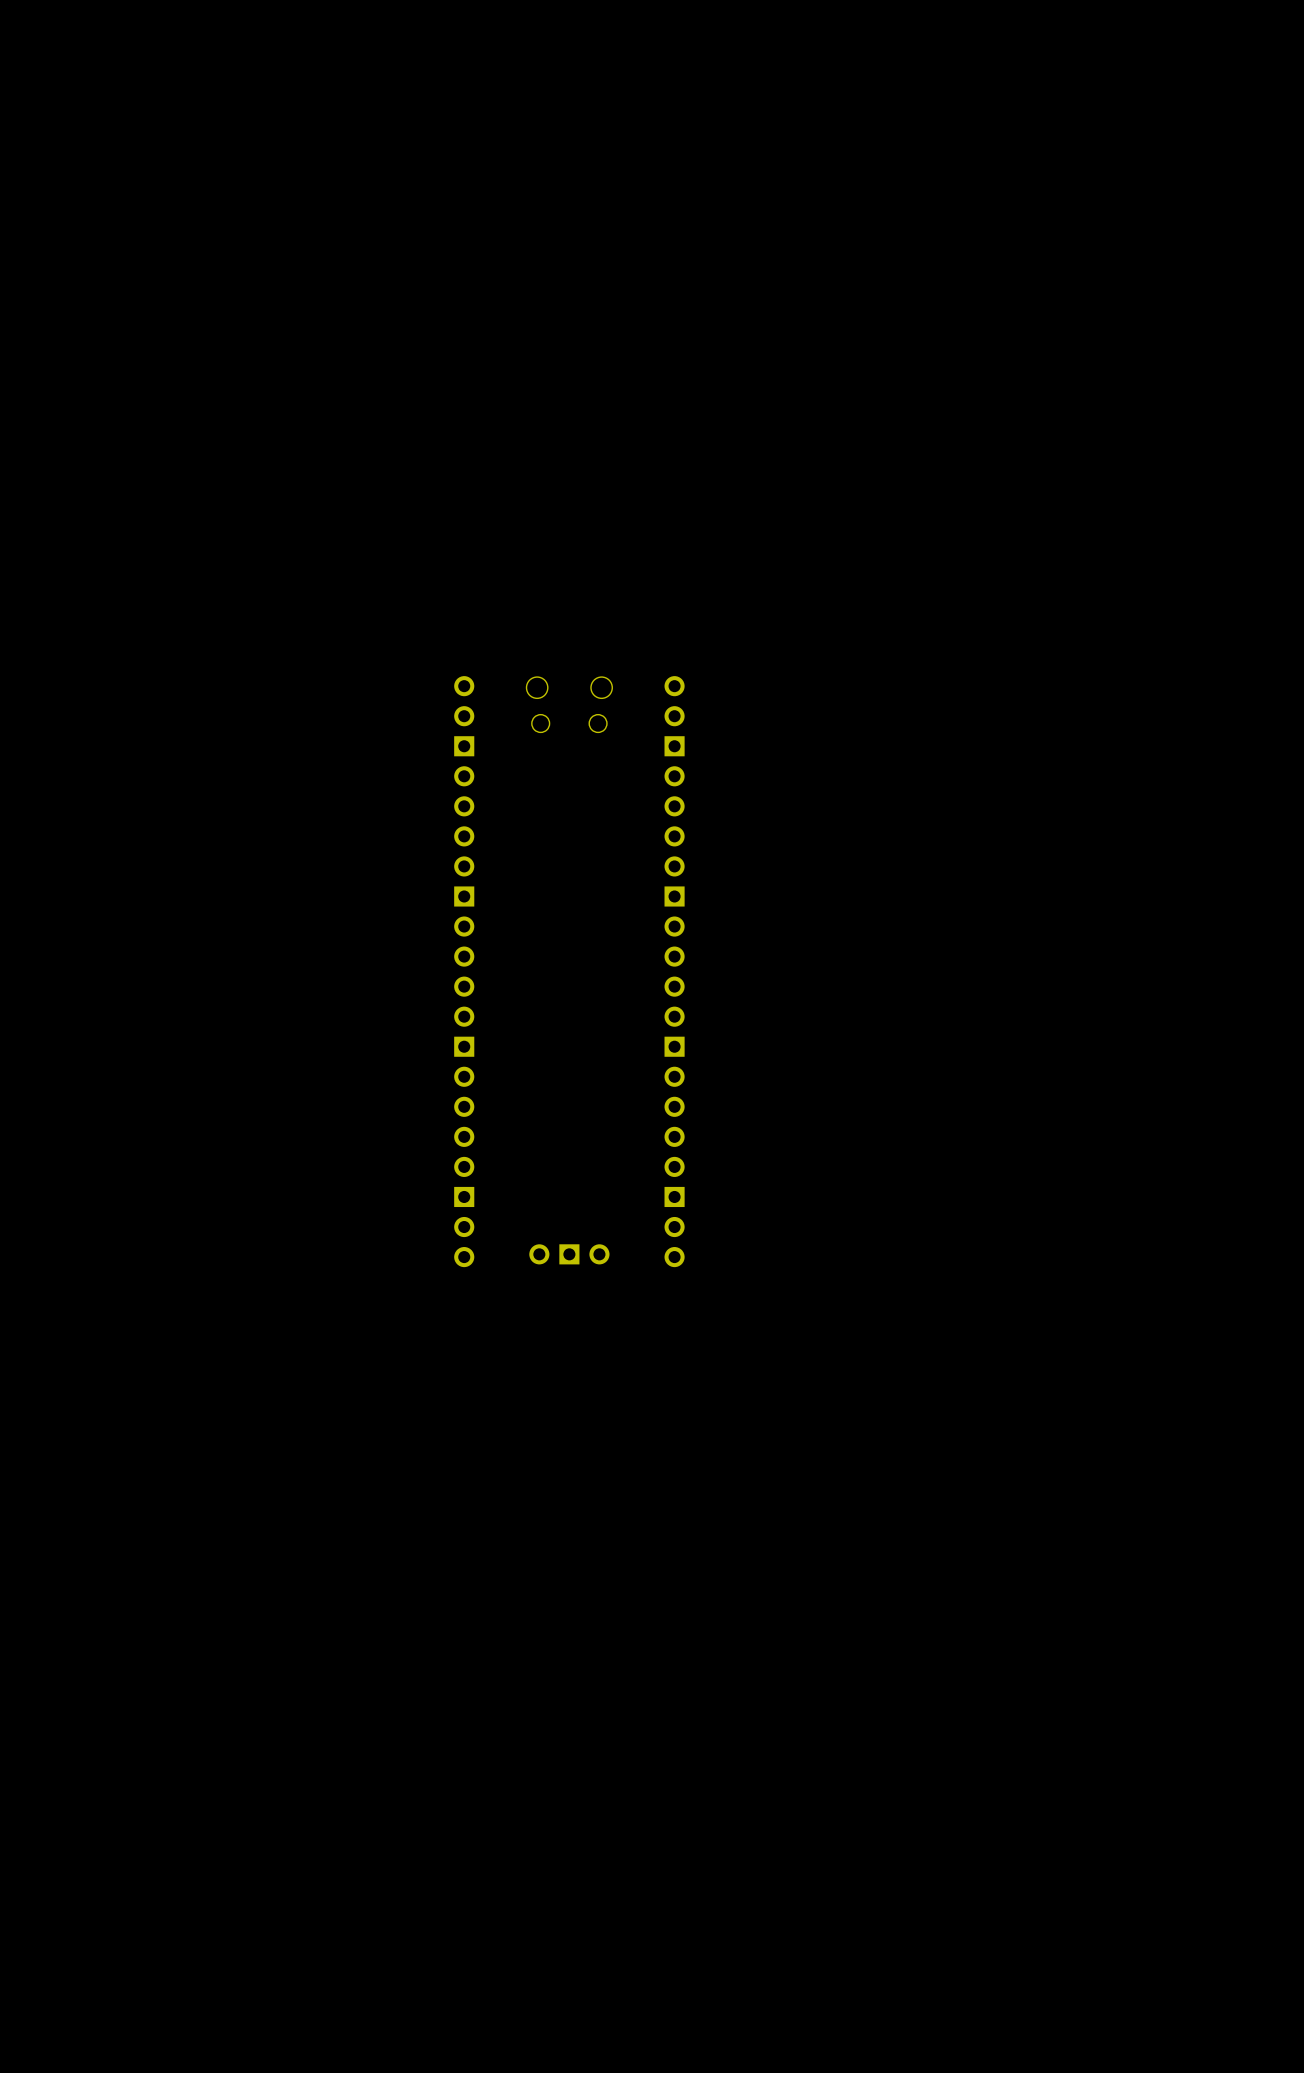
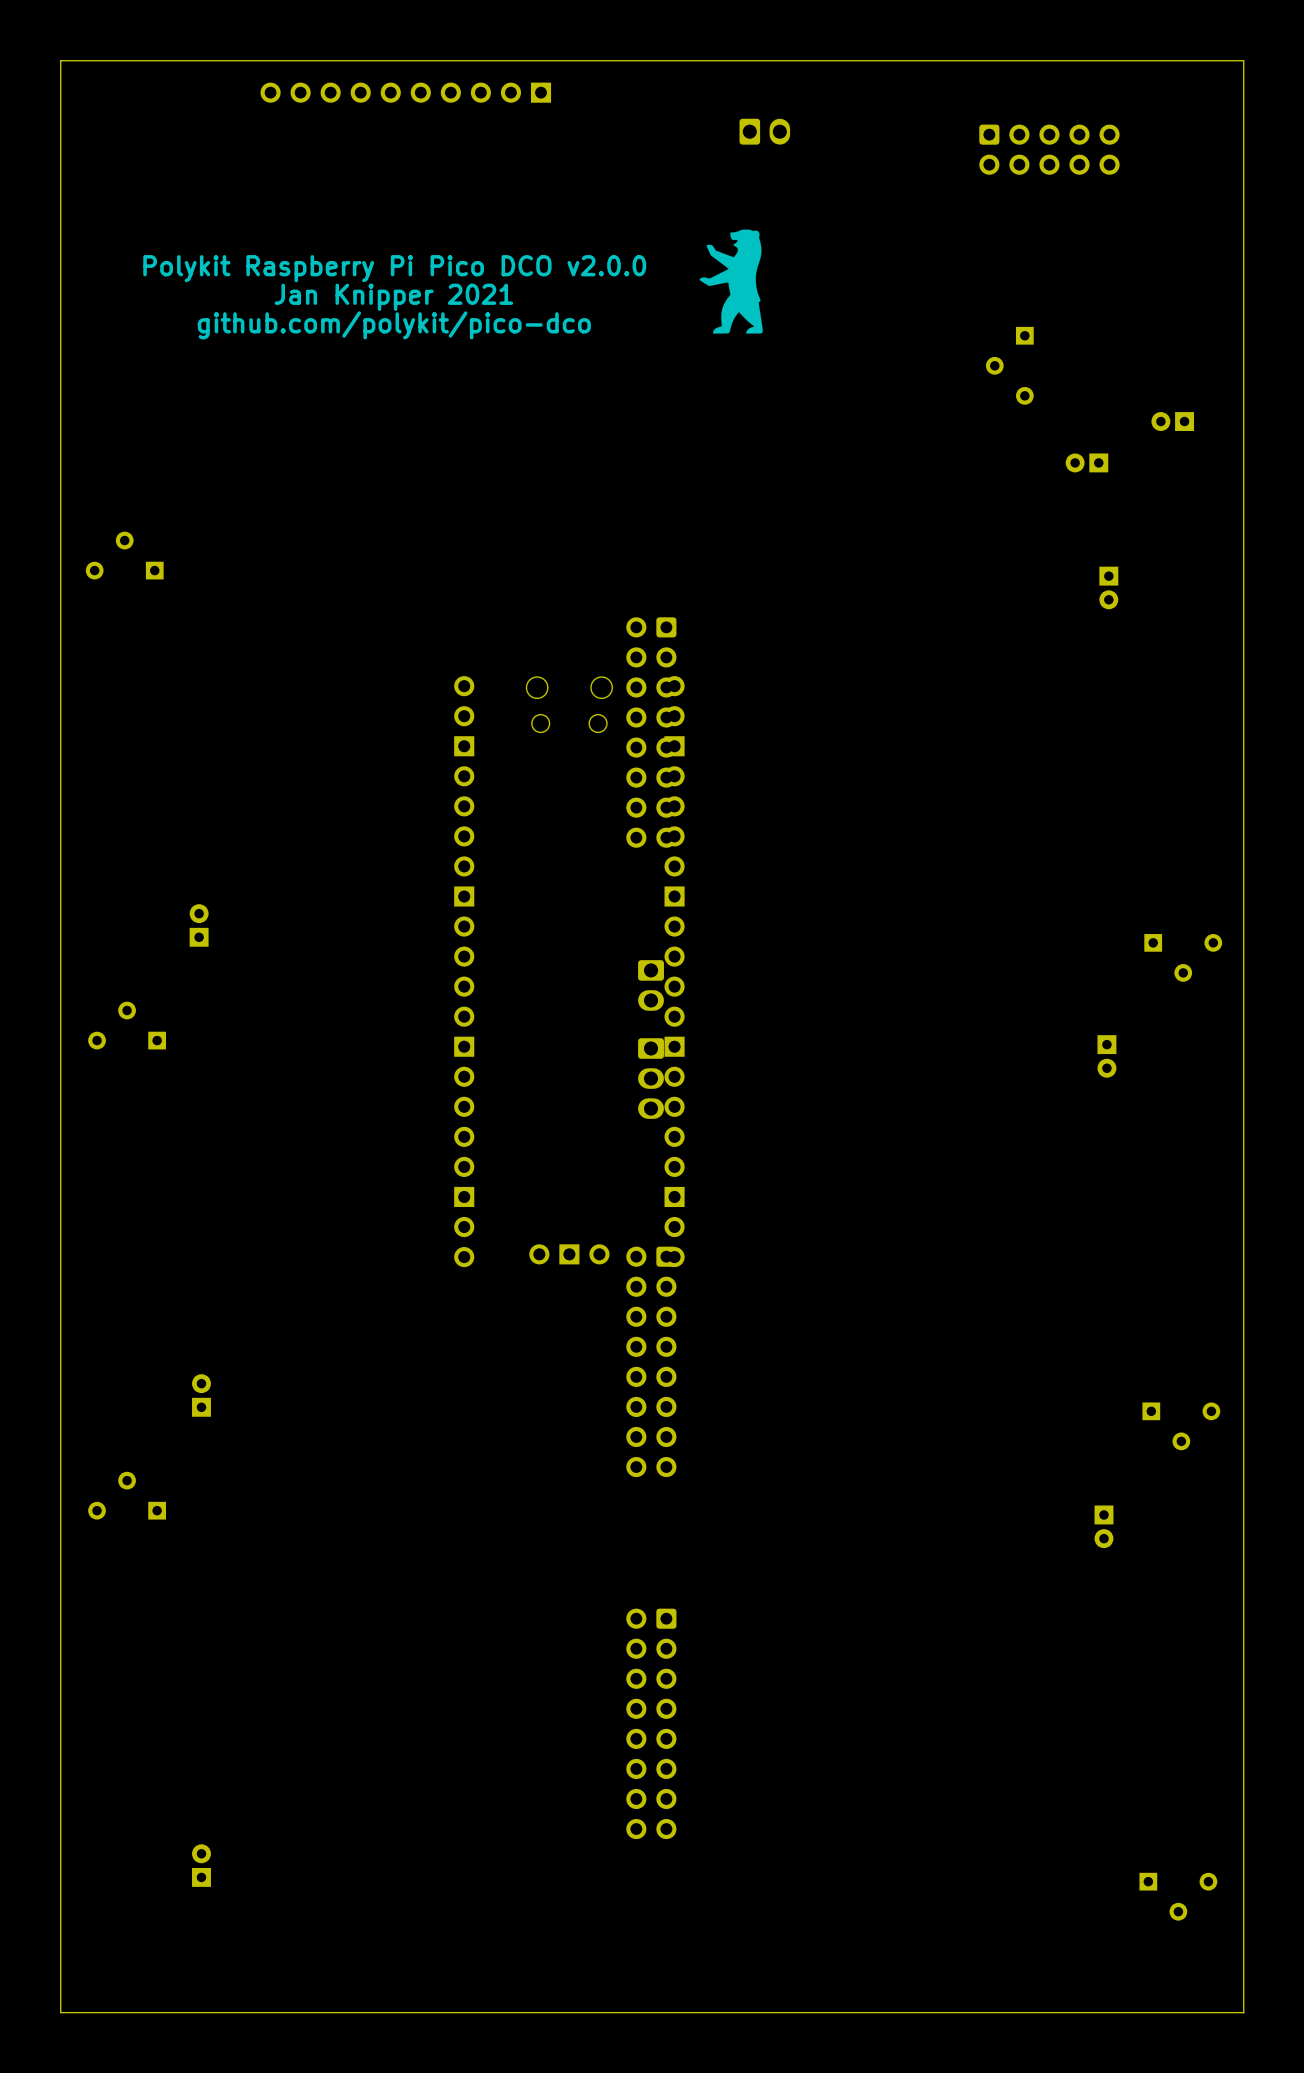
board edge: none -> (1243, 60) (60, 60) (60, 2012) (1243, 2012) (1243, 60)
part: none -> (405, 92)
part: none -> (764, 131)
part: none -> (1049, 149)
drawing: none -> [699, 229, 763, 334]
text: none -> Polykit Raspberry Pi Pico DCO v2.0.0 (394, 268)
text: none -> Jan Knipper 2021 (393, 297)
text: none -> github.com/polykit/pico-dco (394, 325)
part: none -> (1009, 365)
part: none -> (1172, 421)
part: none -> (1086, 462)
part: none -> (124, 555)
part: none -> (1108, 587)
part: none -> (651, 732)
part: none -> (199, 925)
part: none -> (1183, 957)
part: none -> (651, 985)
part: none -> (127, 1025)
part: none -> (1106, 1056)
part: none -> (651, 1078)
part: none -> (651, 1361)
part: none -> (201, 1395)
part: none -> (1181, 1426)
part: none -> (127, 1495)
part: none -> (1103, 1526)
part: none -> (651, 1723)
part: none -> (201, 1865)
part: none -> (1178, 1896)

